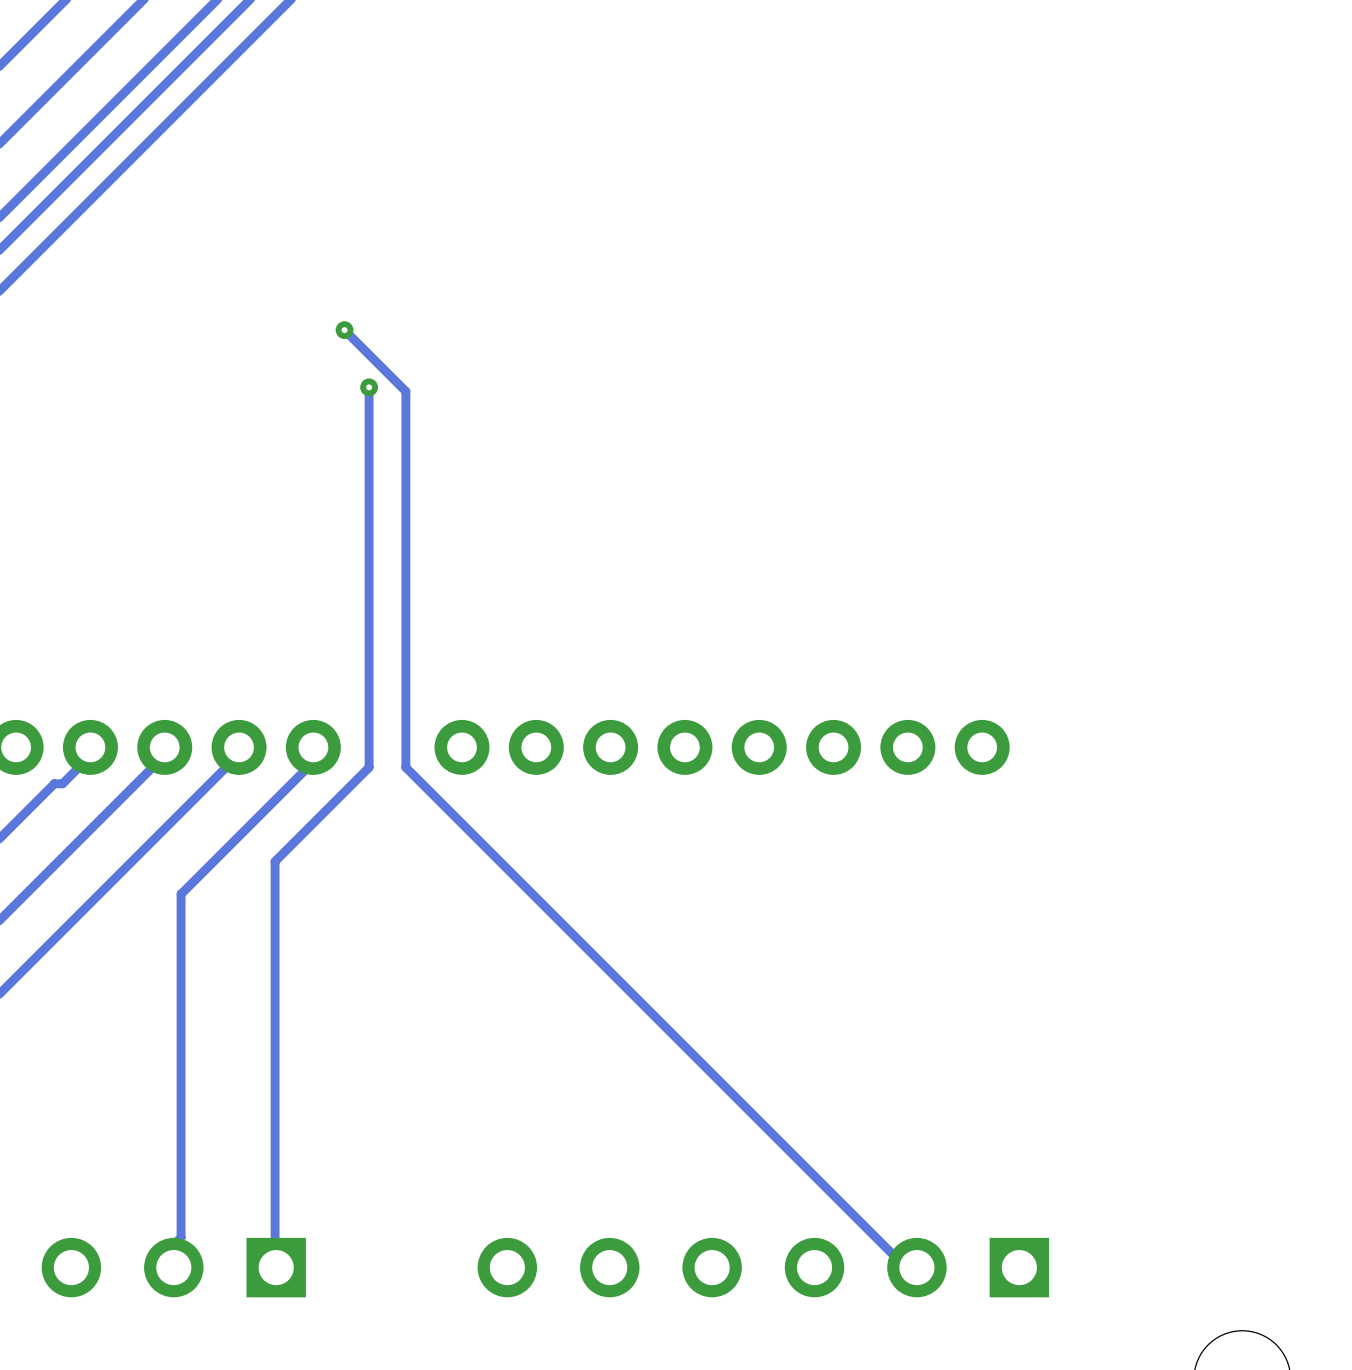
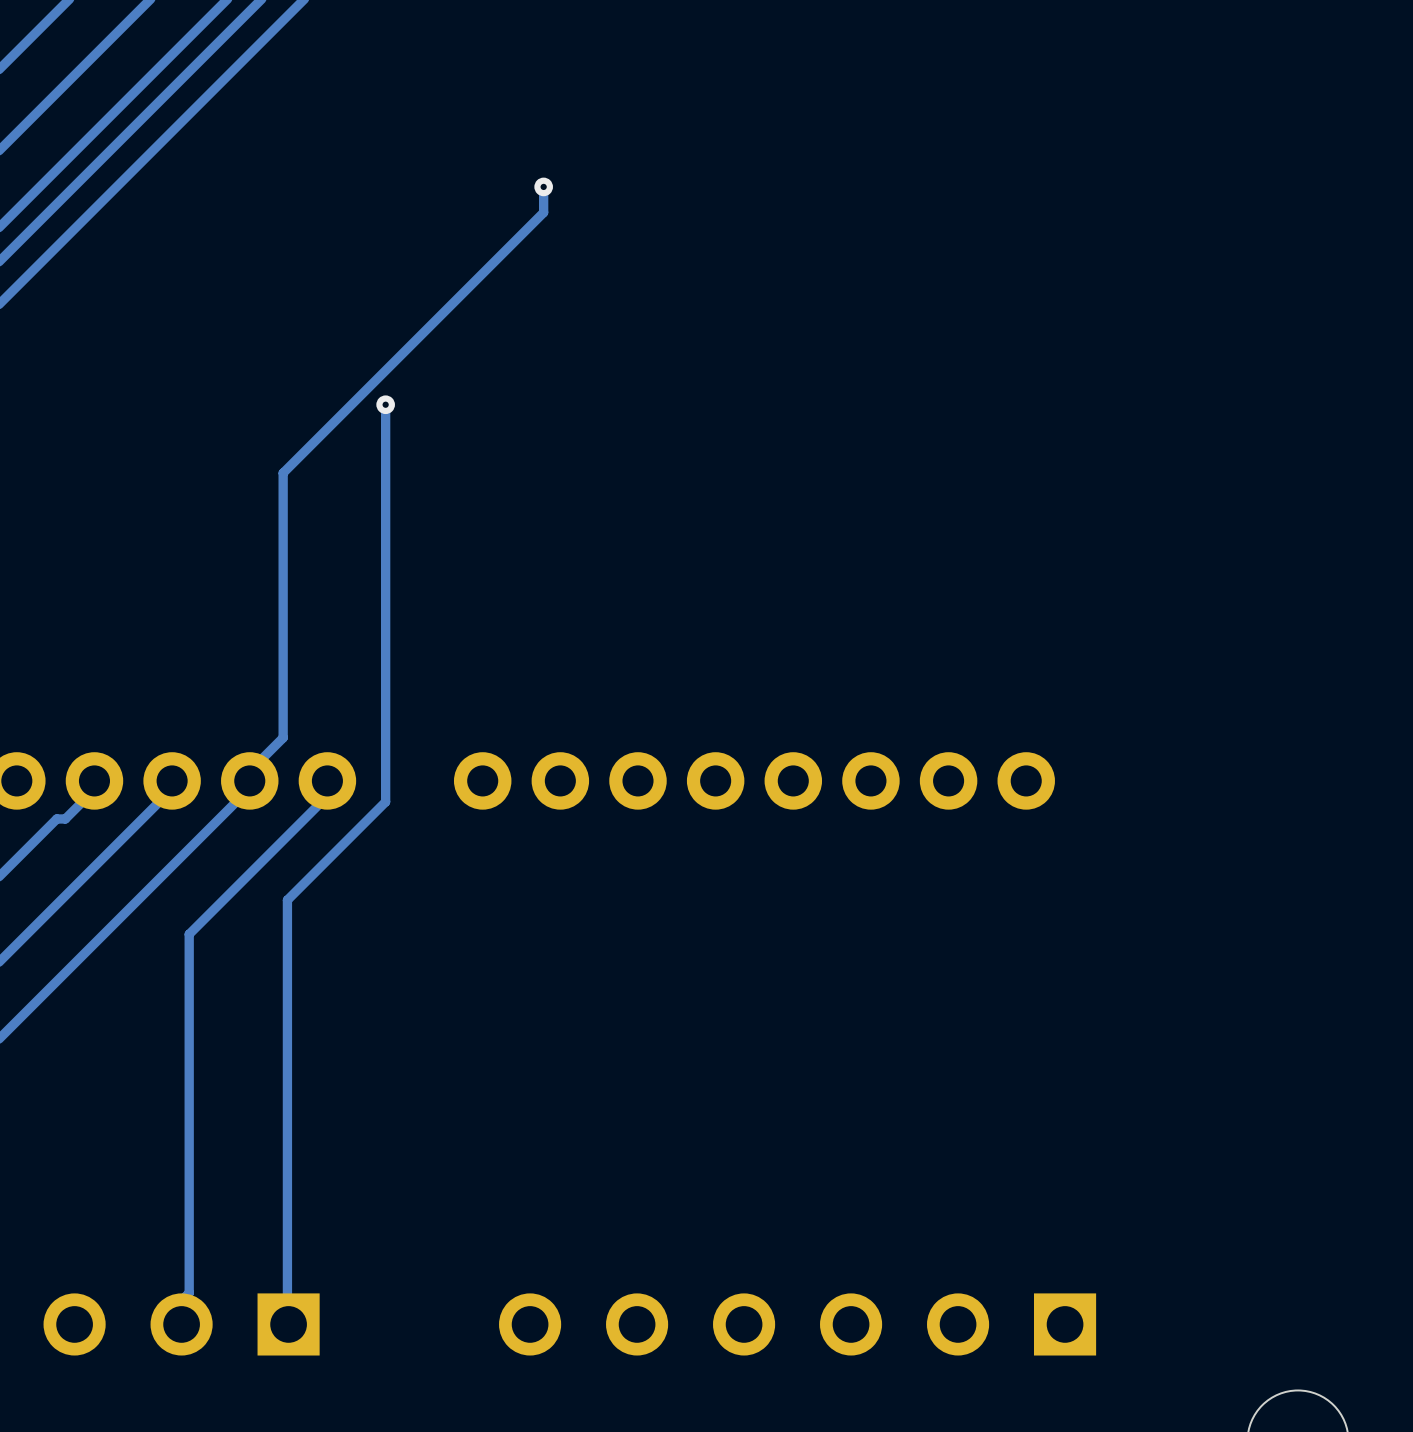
track: none -> (543, 186) (543, 212) (283, 473) (283, 737) (248, 772) (249, 780)
via: none -> (543, 186)
track: (344, 330) (405, 391) (405, 767) (904, 1266) (916, 1267) -> none
via: (344, 330) -> none

